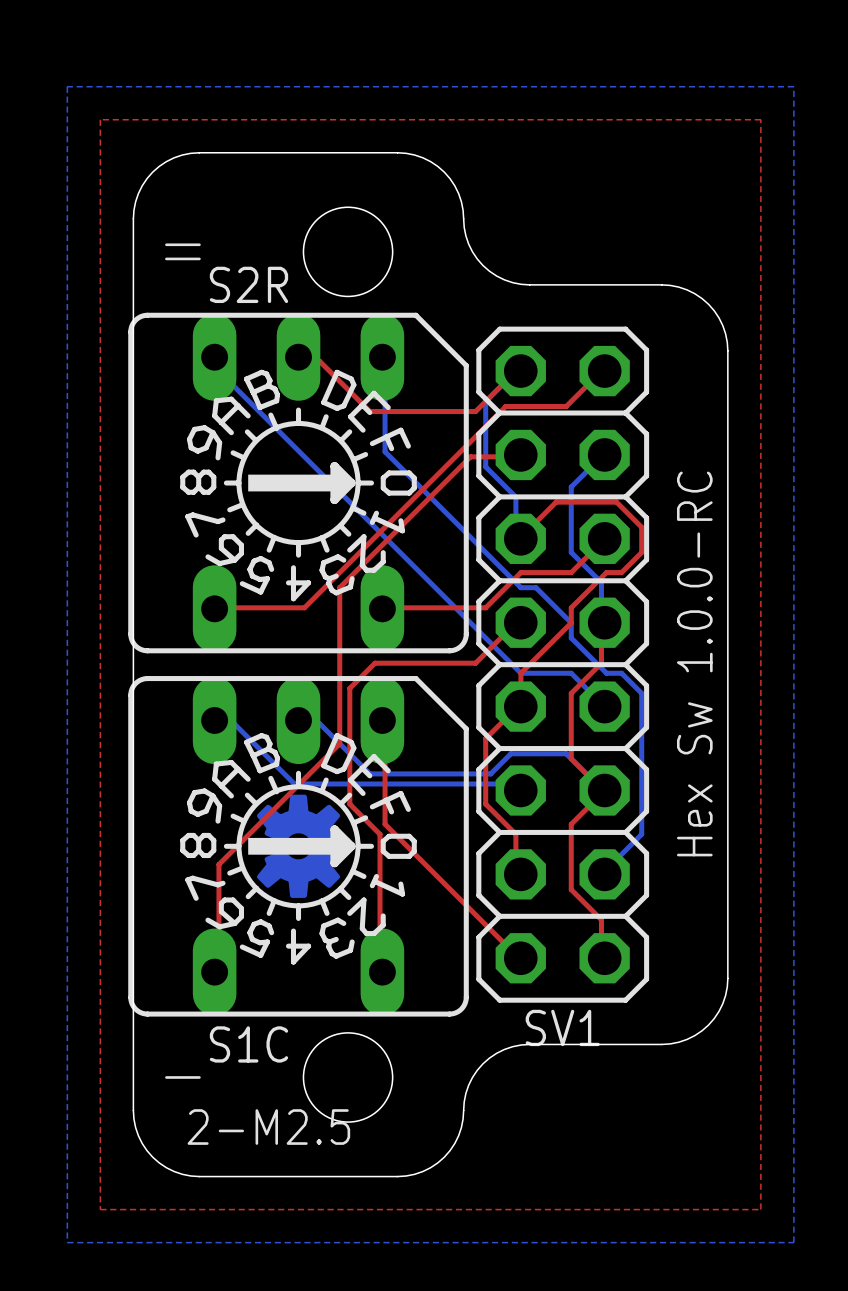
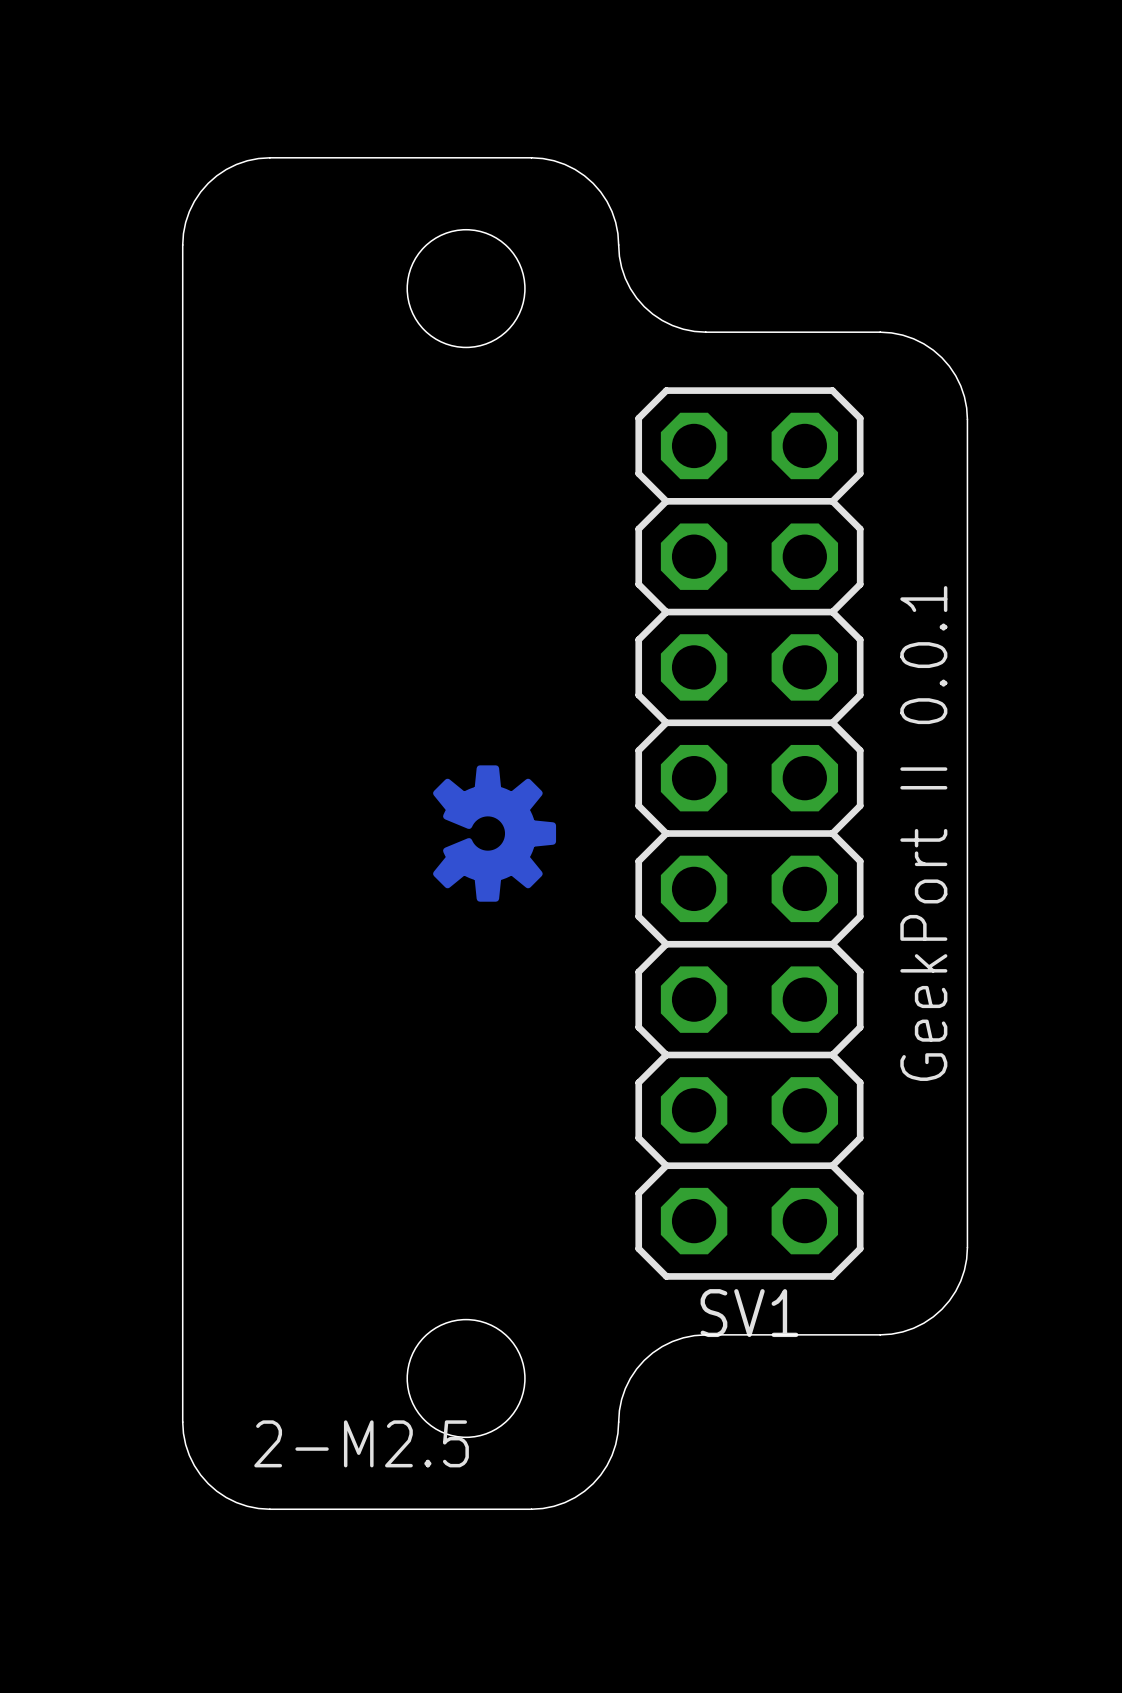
bottom zone outline: (67, 86) (793, 86) (793, 1242) (67, 1242) (67, 86) -> none
top zone outline: (100, 119) (760, 119) (760, 1209) (100, 1209) (100, 119) -> none
text: II (182, 251) -> none
bottom track: (214, 357) (218, 361) (218, 371) (520, 673) (571, 673) (604, 706) -> none
top track: (298, 357) (299, 361) (319, 361) (369, 411) (475, 411) (515, 371) (520, 371) -> none
bottom track: (382, 357) (385, 361) (385, 451) (520, 587) (536, 587) (571, 622) (571, 638) (606, 673) (621, 673) (641, 693) (641, 834) (606, 869) (604, 874) -> none
bottom track: (520, 371) (515, 371) (485, 401) (485, 466) (515, 497) (515, 537) (520, 538) -> none
top track: (604, 371) (601, 371) (566, 406) (505, 406) (304, 607) (214, 608) -> none
top track: (520, 454) (515, 456) (470, 456) (339, 587) (339, 743) (218, 864) (218, 970) (214, 972) -> none
bottom track: (604, 454) (571, 487) (571, 552) (601, 582) (601, 617) (604, 622) -> none
S2R: (298, 483) -> none
top track: (520, 538) (556, 502) (616, 502) (641, 527) (641, 552) (621, 572) (606, 572) (571, 607) (571, 622) (520, 673) (520, 706) (515, 708) (485, 738) (485, 804) (515, 834) (515, 869) (520, 874) -> none
top track: (604, 538) (571, 572) (520, 572) (485, 607) (382, 608) -> none
top track: (520, 622) (515, 622) (475, 663) (374, 663) (349, 688) (349, 804) (380, 834) (380, 970) (382, 972) -> none
top track: (604, 622) (601, 622) (601, 663) (571, 693) (571, 758) (604, 790) (571, 824) (571, 889) (601, 919) (601, 955) (604, 958) -> none
text: Hex Sw 1.0.0-RC (694, 663) -> GeekPort II 0.0.1 (923, 833)
bottom track: (214, 720) (218, 723) (234, 723) (294, 783) (510, 783) (520, 790) -> none
bottom track: (298, 720) (299, 723) (319, 723) (369, 773) (490, 773) (510, 753) (566, 753) (604, 790) -> none
top track: (382, 720) (385, 723) (385, 824) (520, 958) -> none
S1C: (298, 846) -> none
drawing position: (303, 846) -> (494, 833)
text: I (182, 1077) -> none

